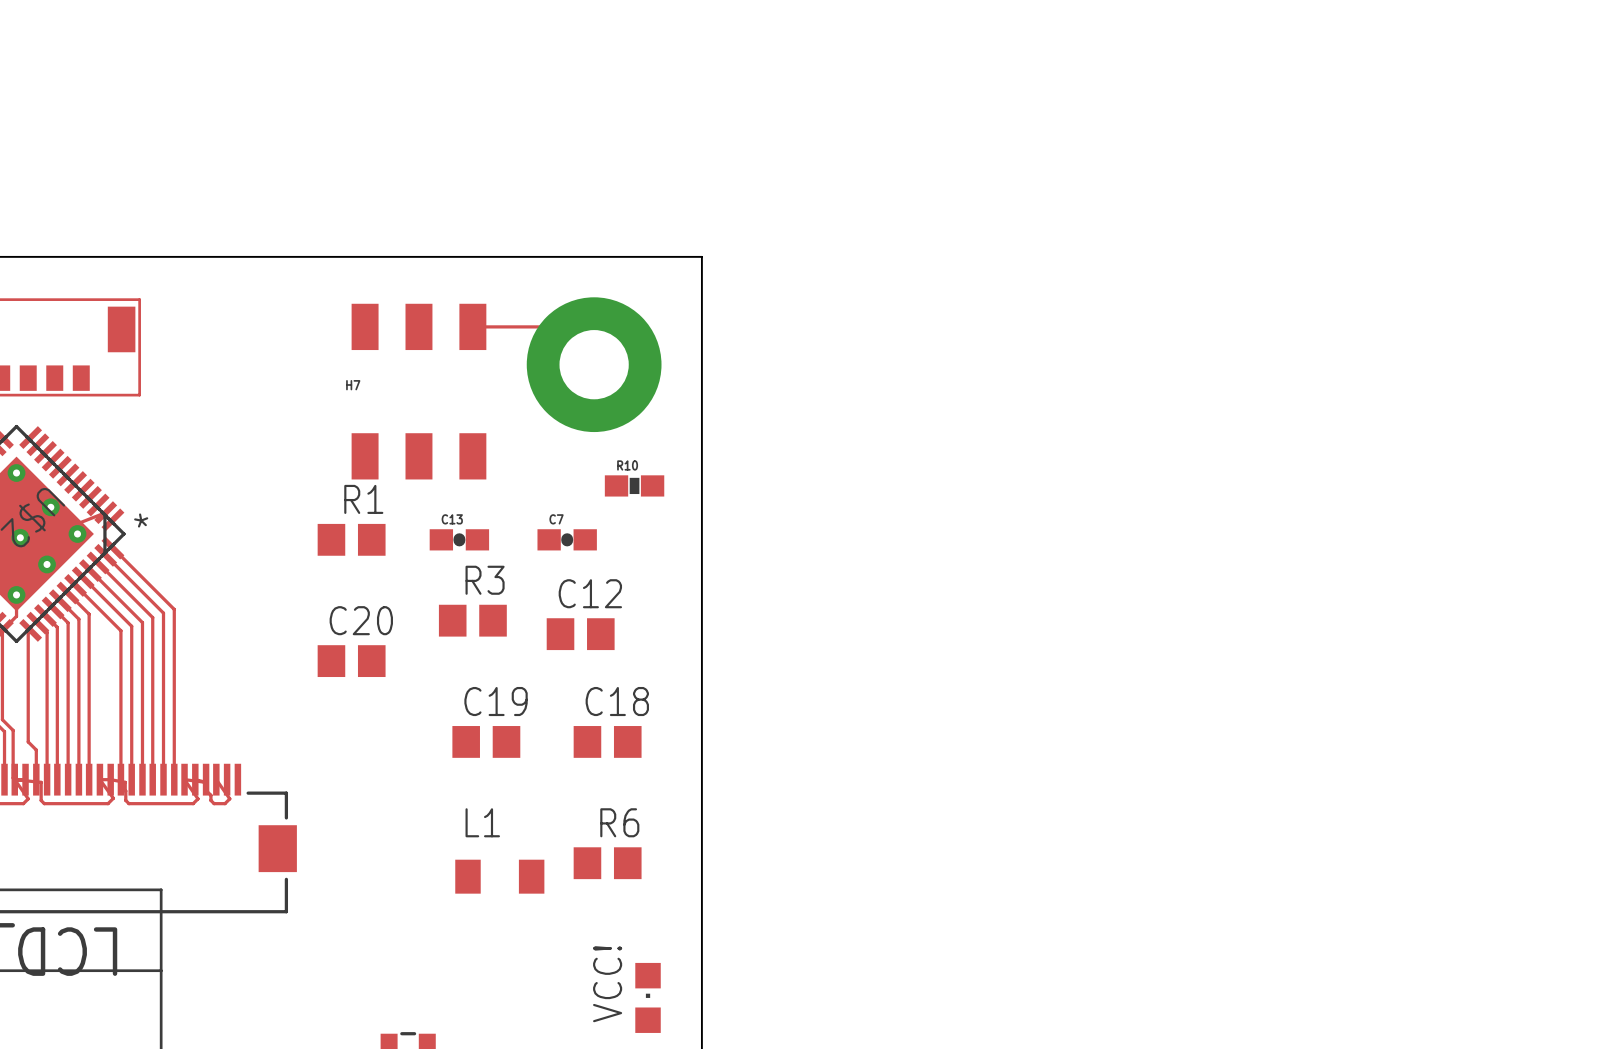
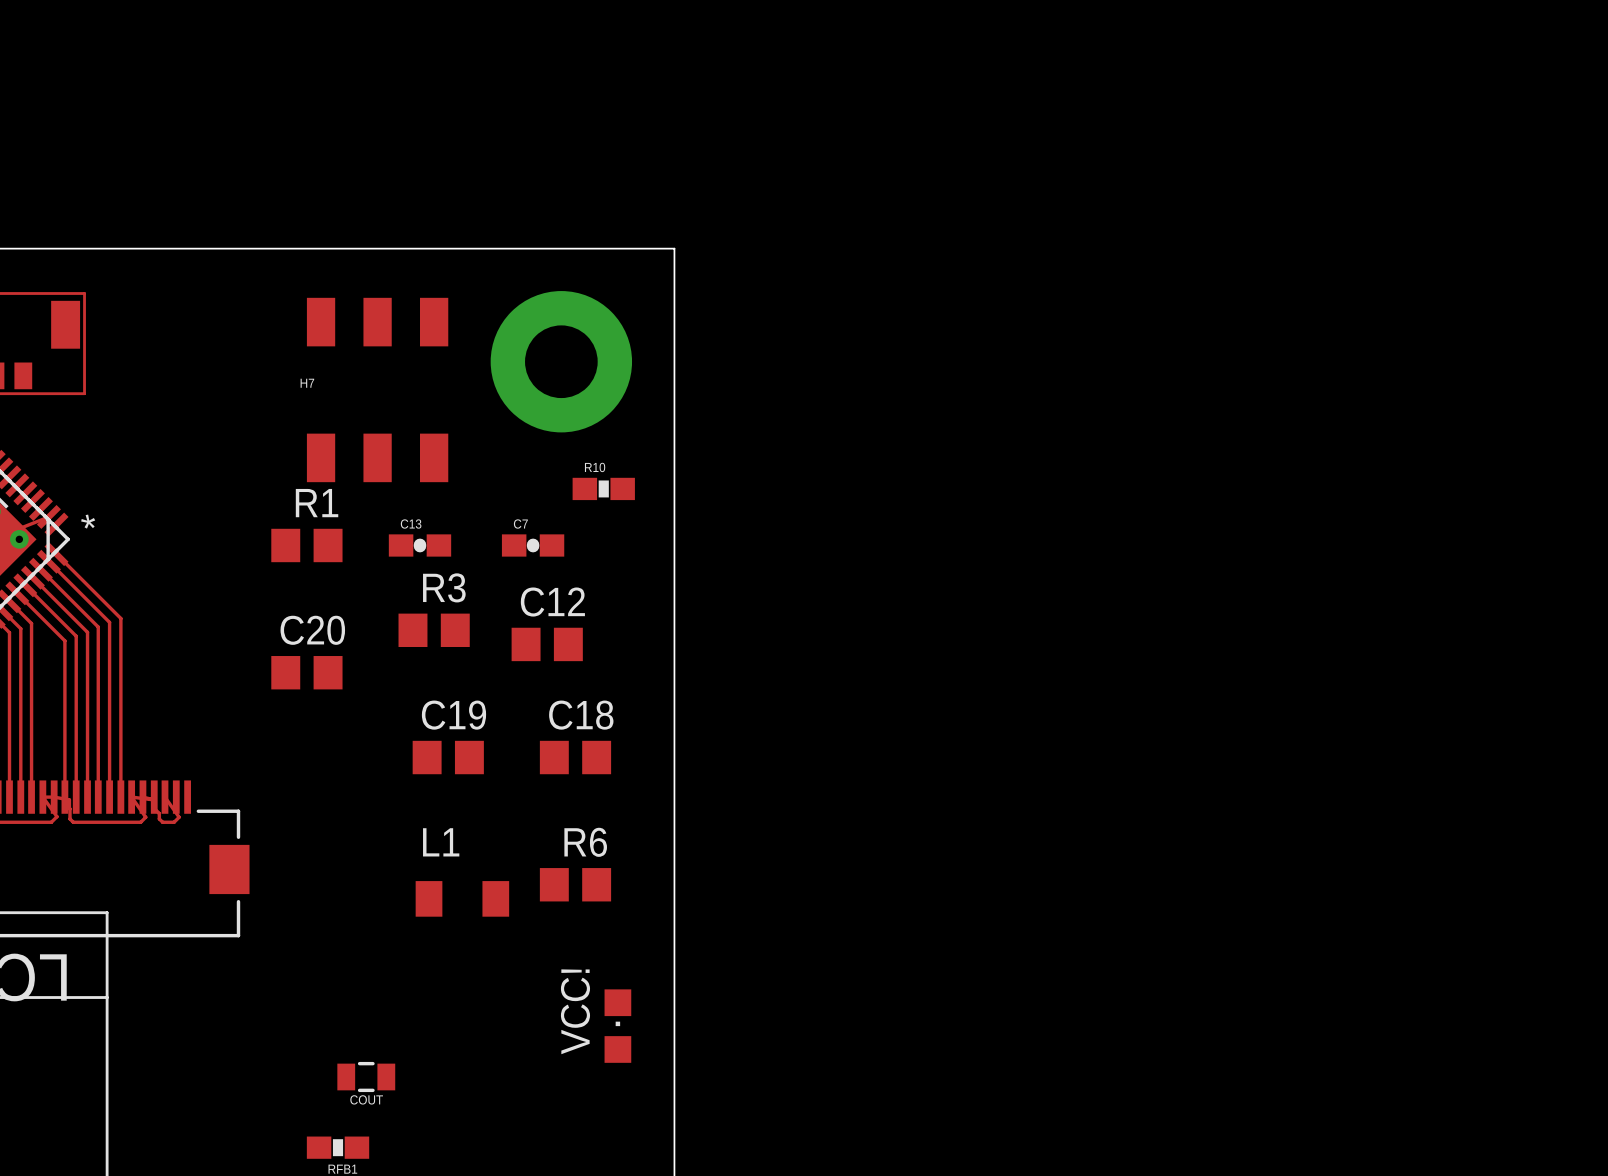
top track: (472, 326) (556, 326) (594, 364) -> none

